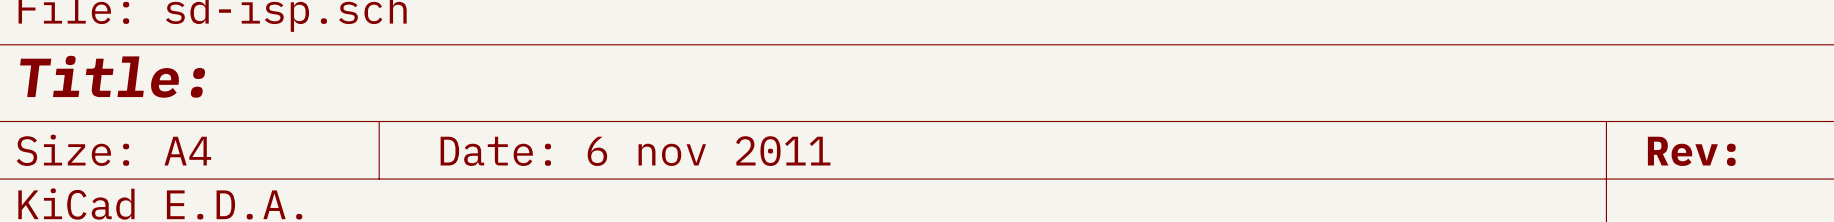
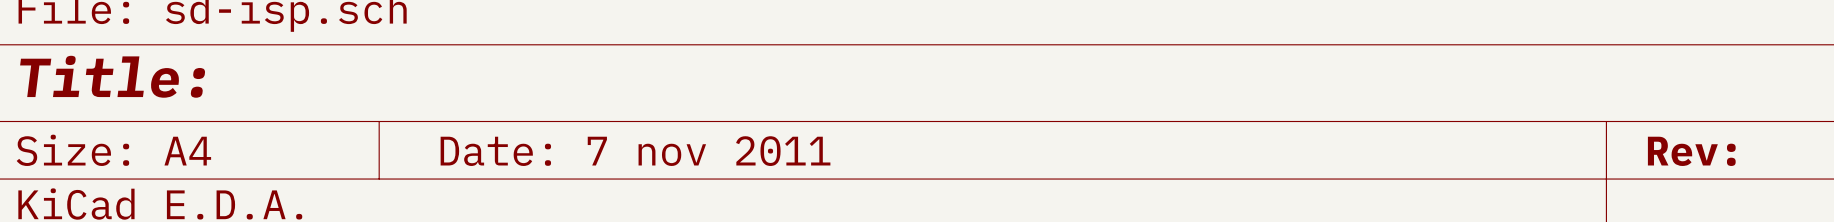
title block: Date: 6 nov 2011 (635, 151) -> Date: 7 nov 2011 (635, 151)

